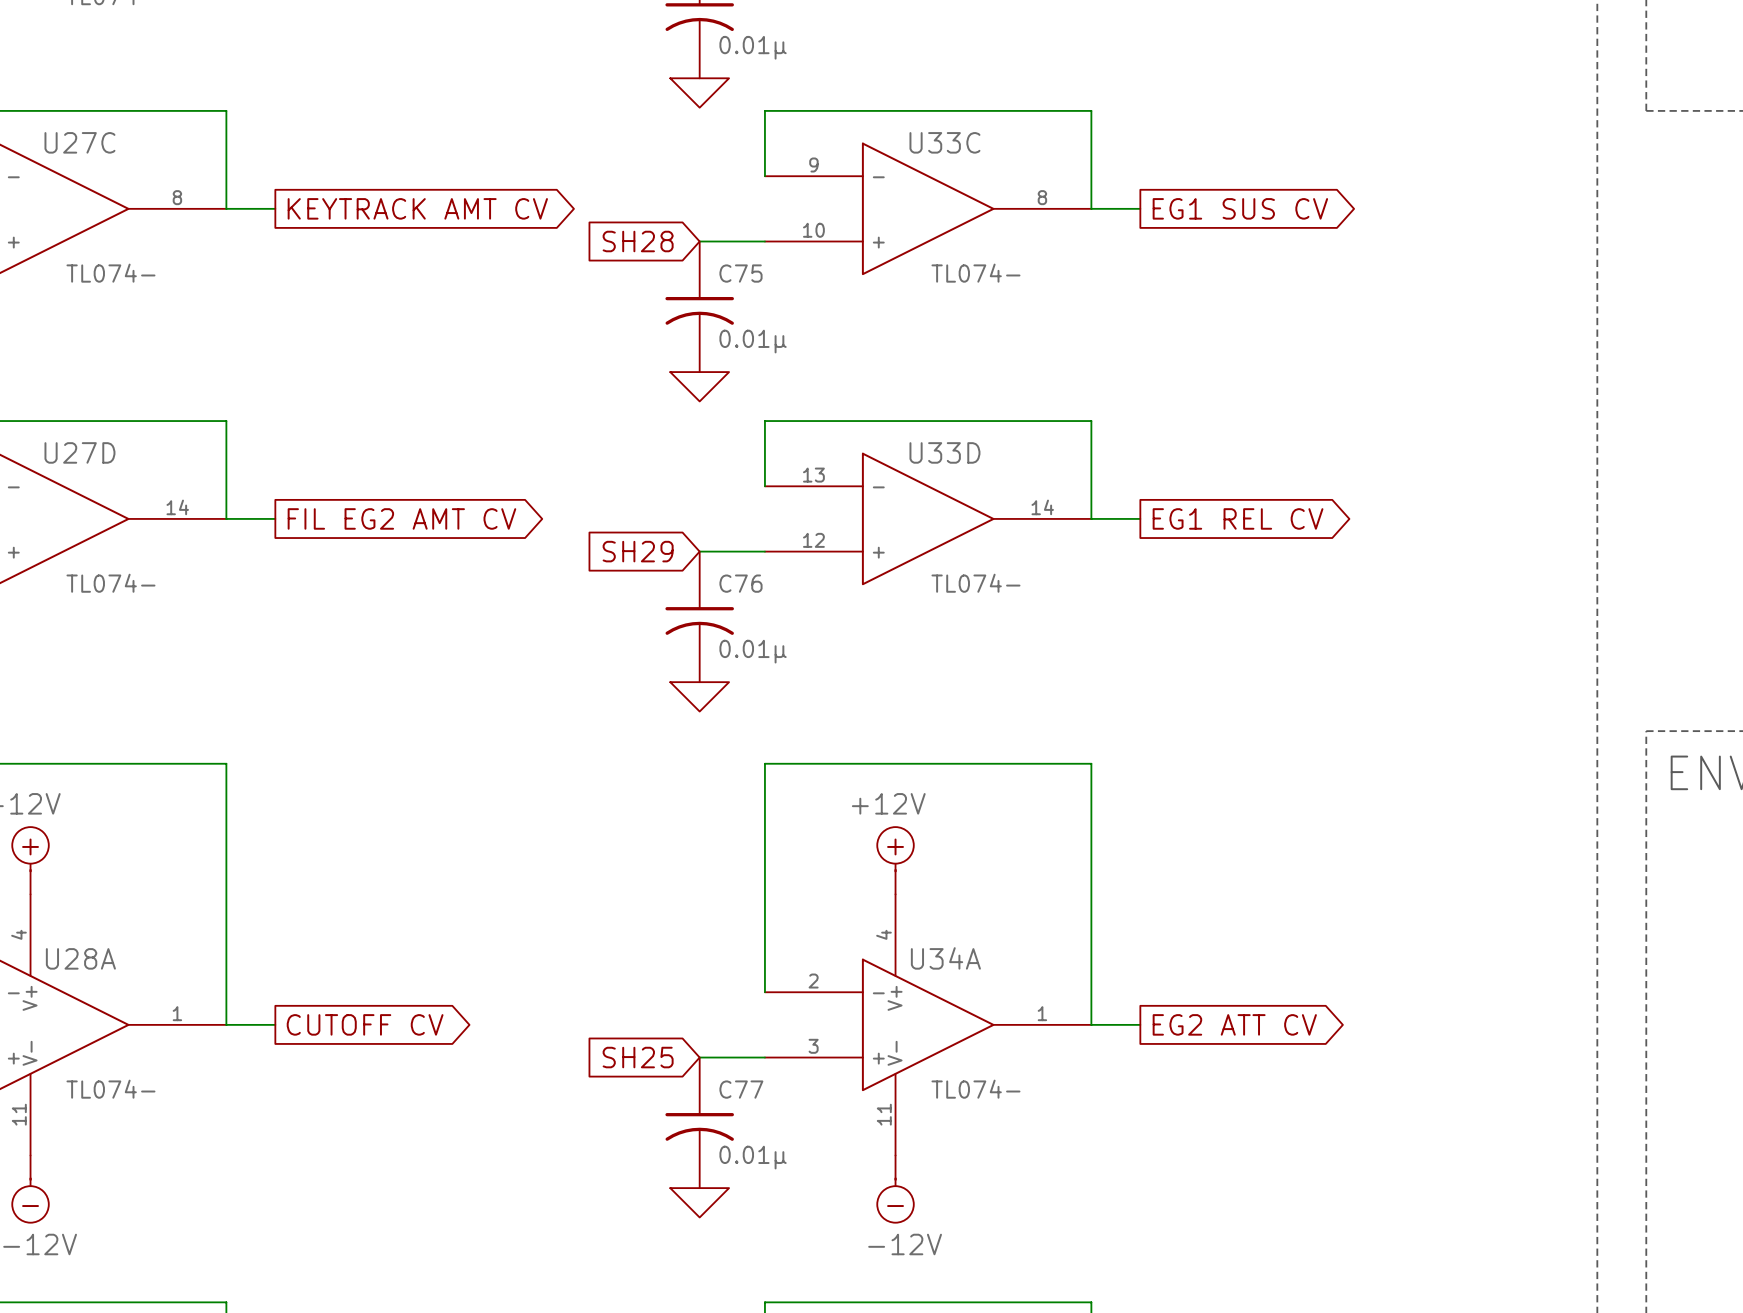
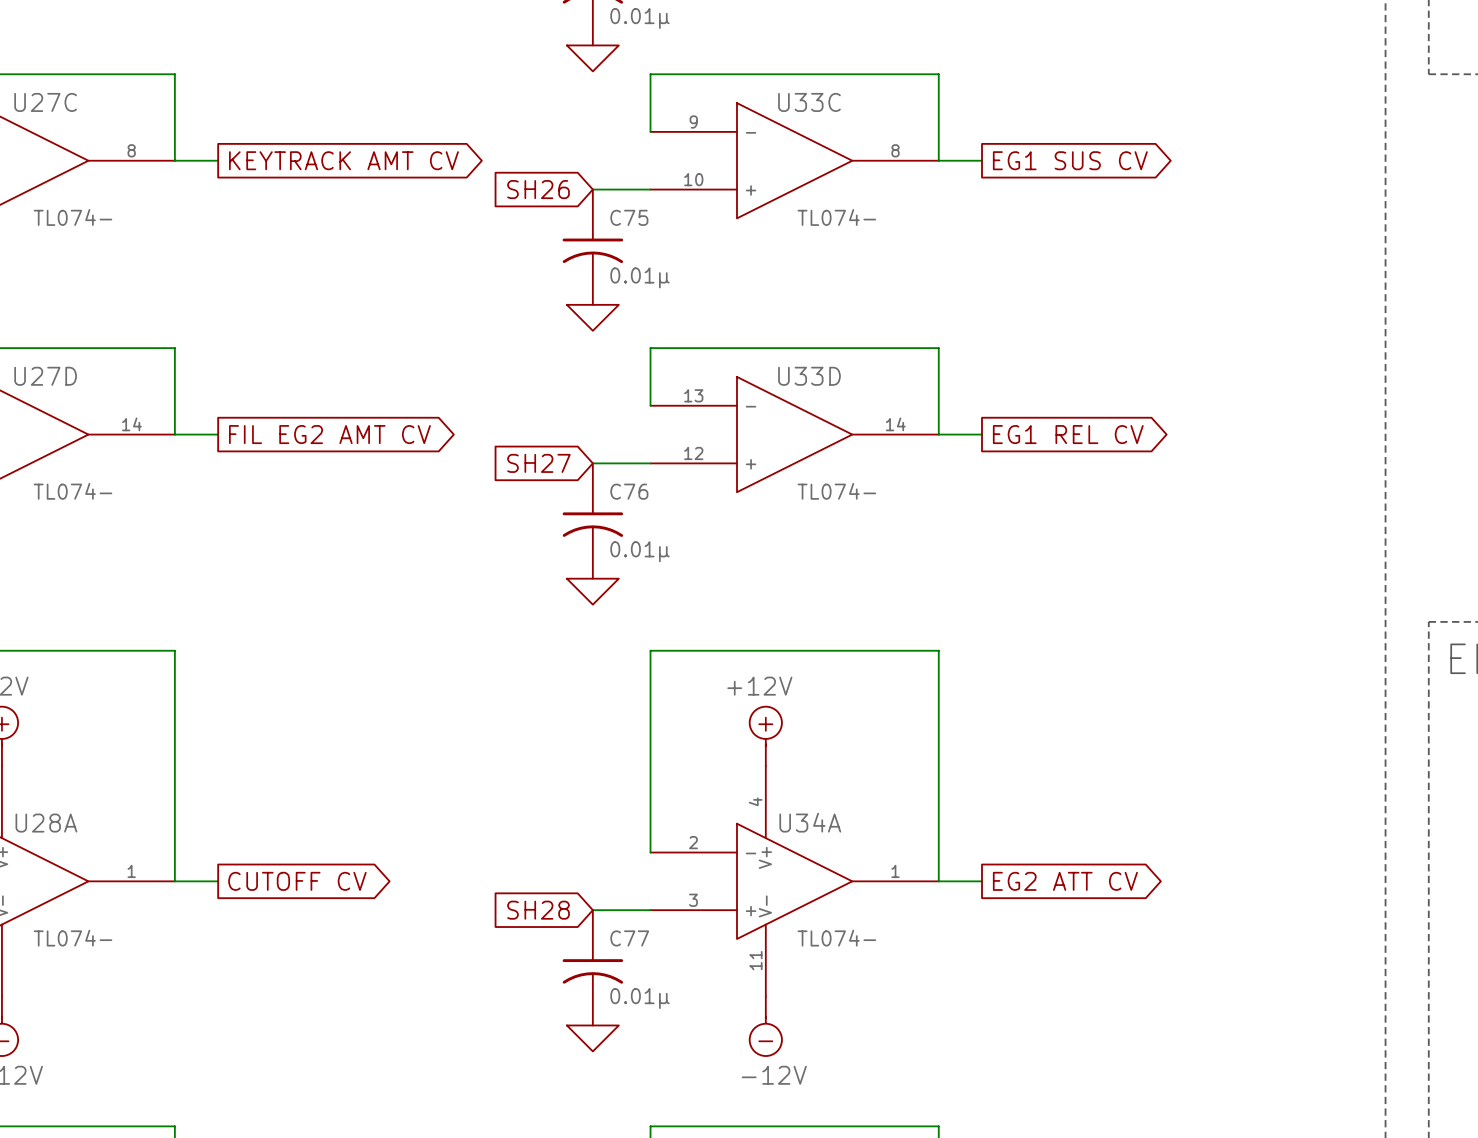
global label: SH28 (638, 241) -> SH26 (538, 189)
global label: SH29 (638, 551) -> SH27 (538, 463)
global label: SH25 (638, 1057) -> SH28 (538, 910)

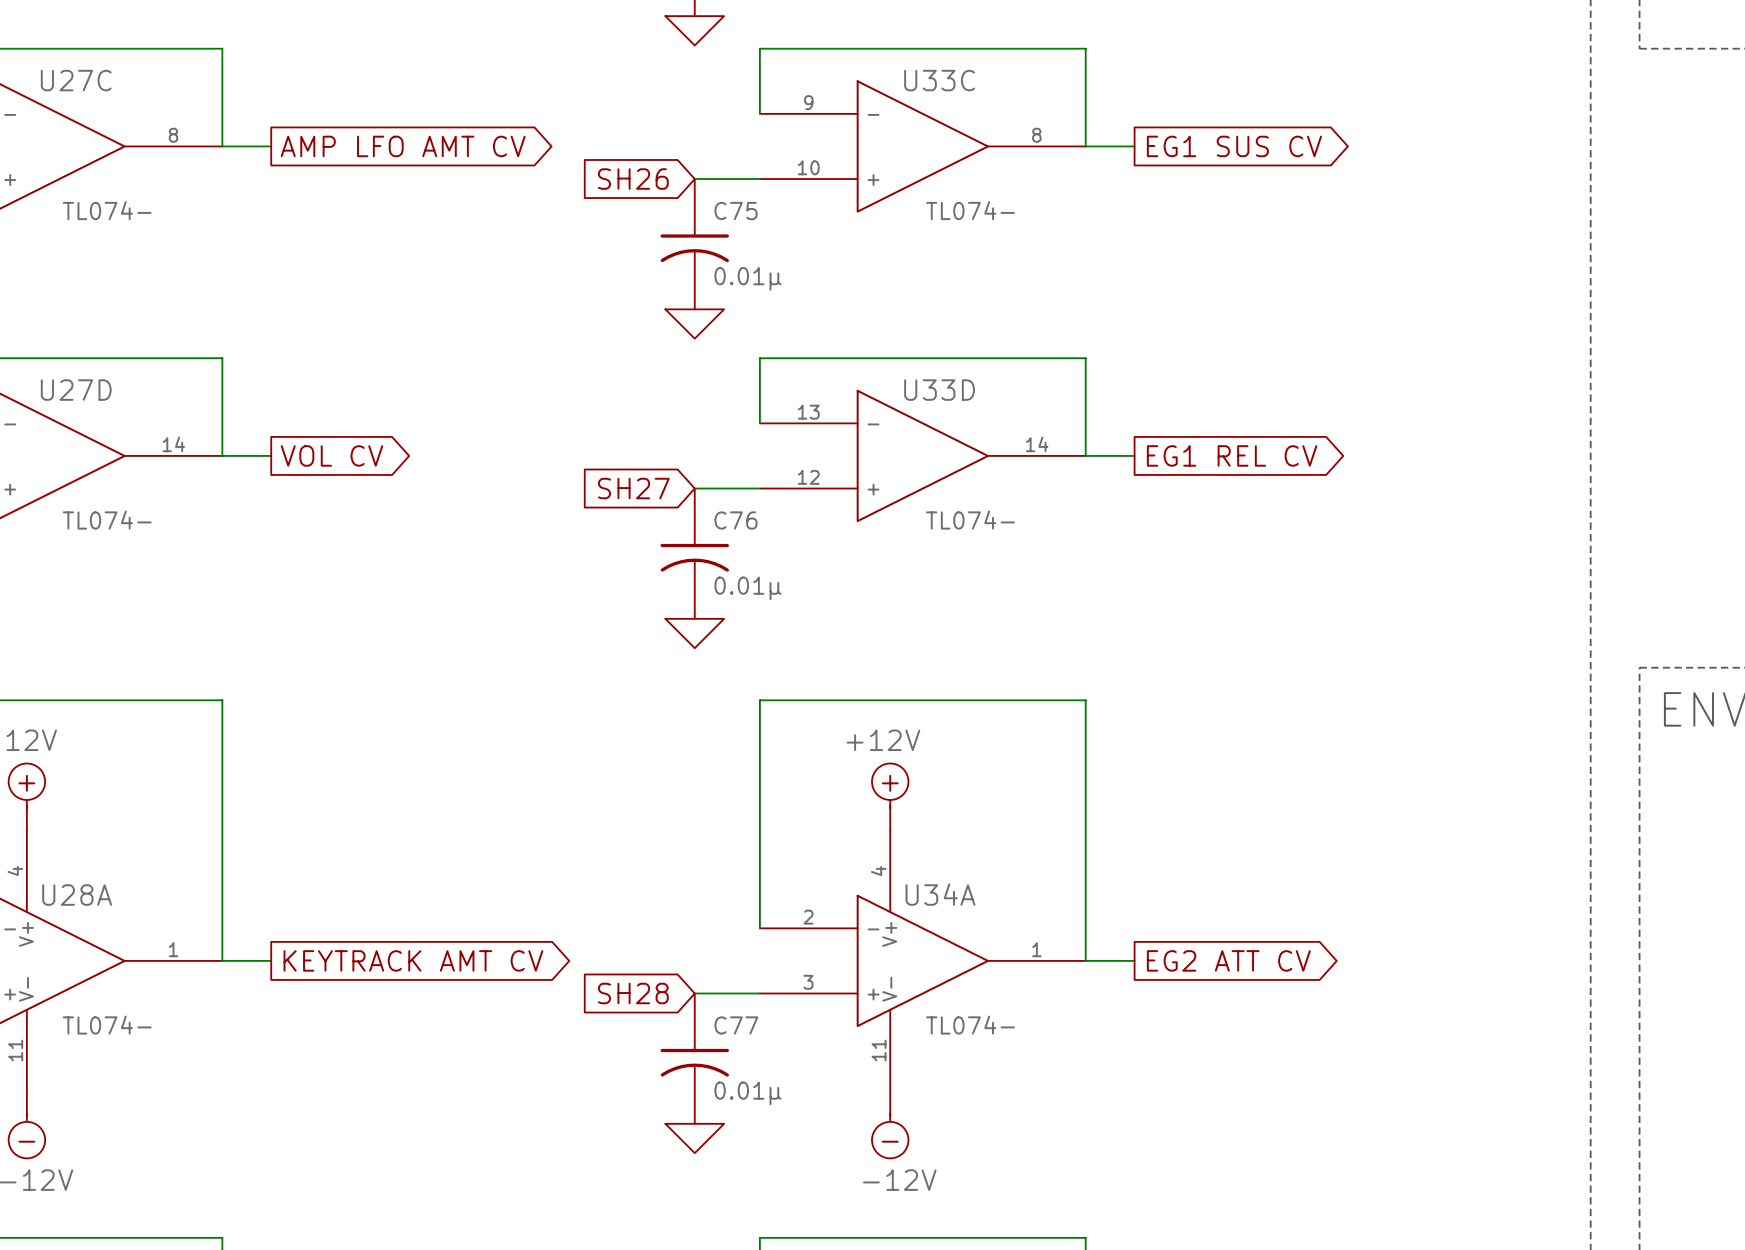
global label: KEYTRACK AMT CV (343, 160) -> AMP LFO AMT CV (403, 146)
global label: FIL EG2 AMT CV (329, 434) -> VOL CV (331, 455)
global label: CUTOFF CV (297, 881) -> KEYTRACK AMT CV (413, 960)

